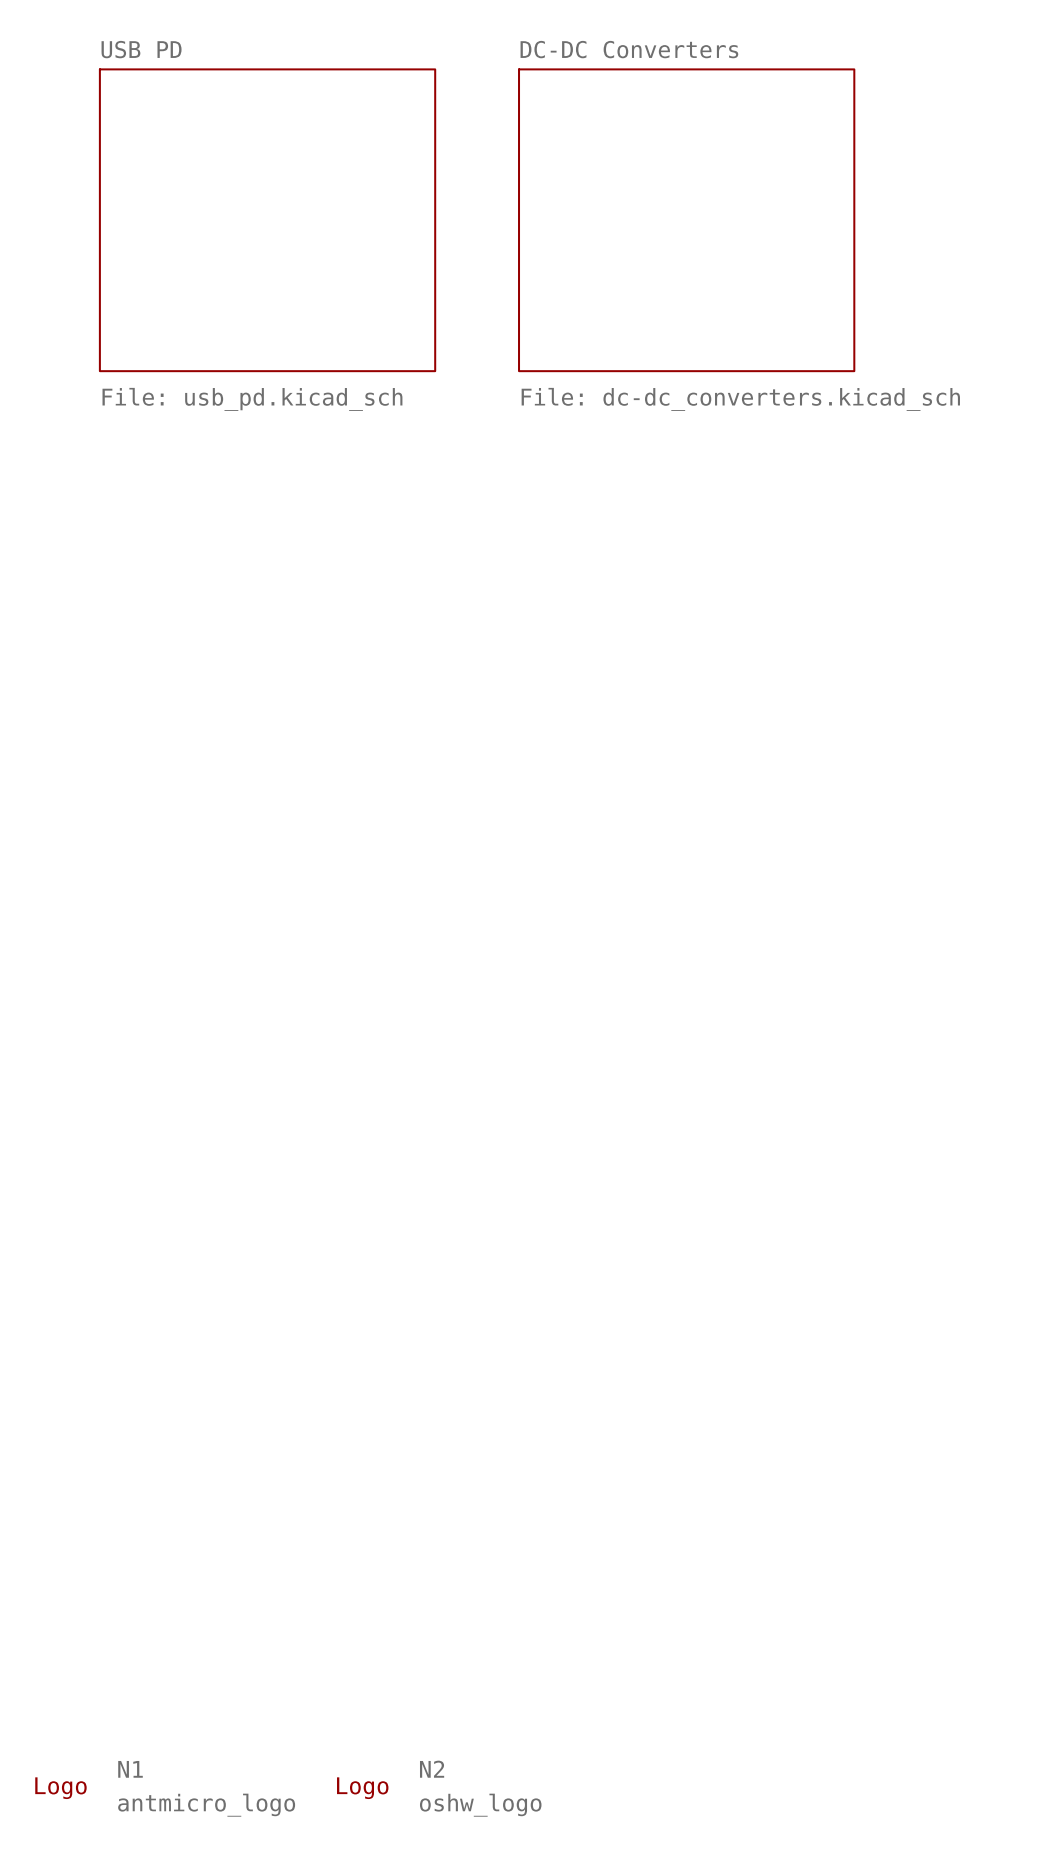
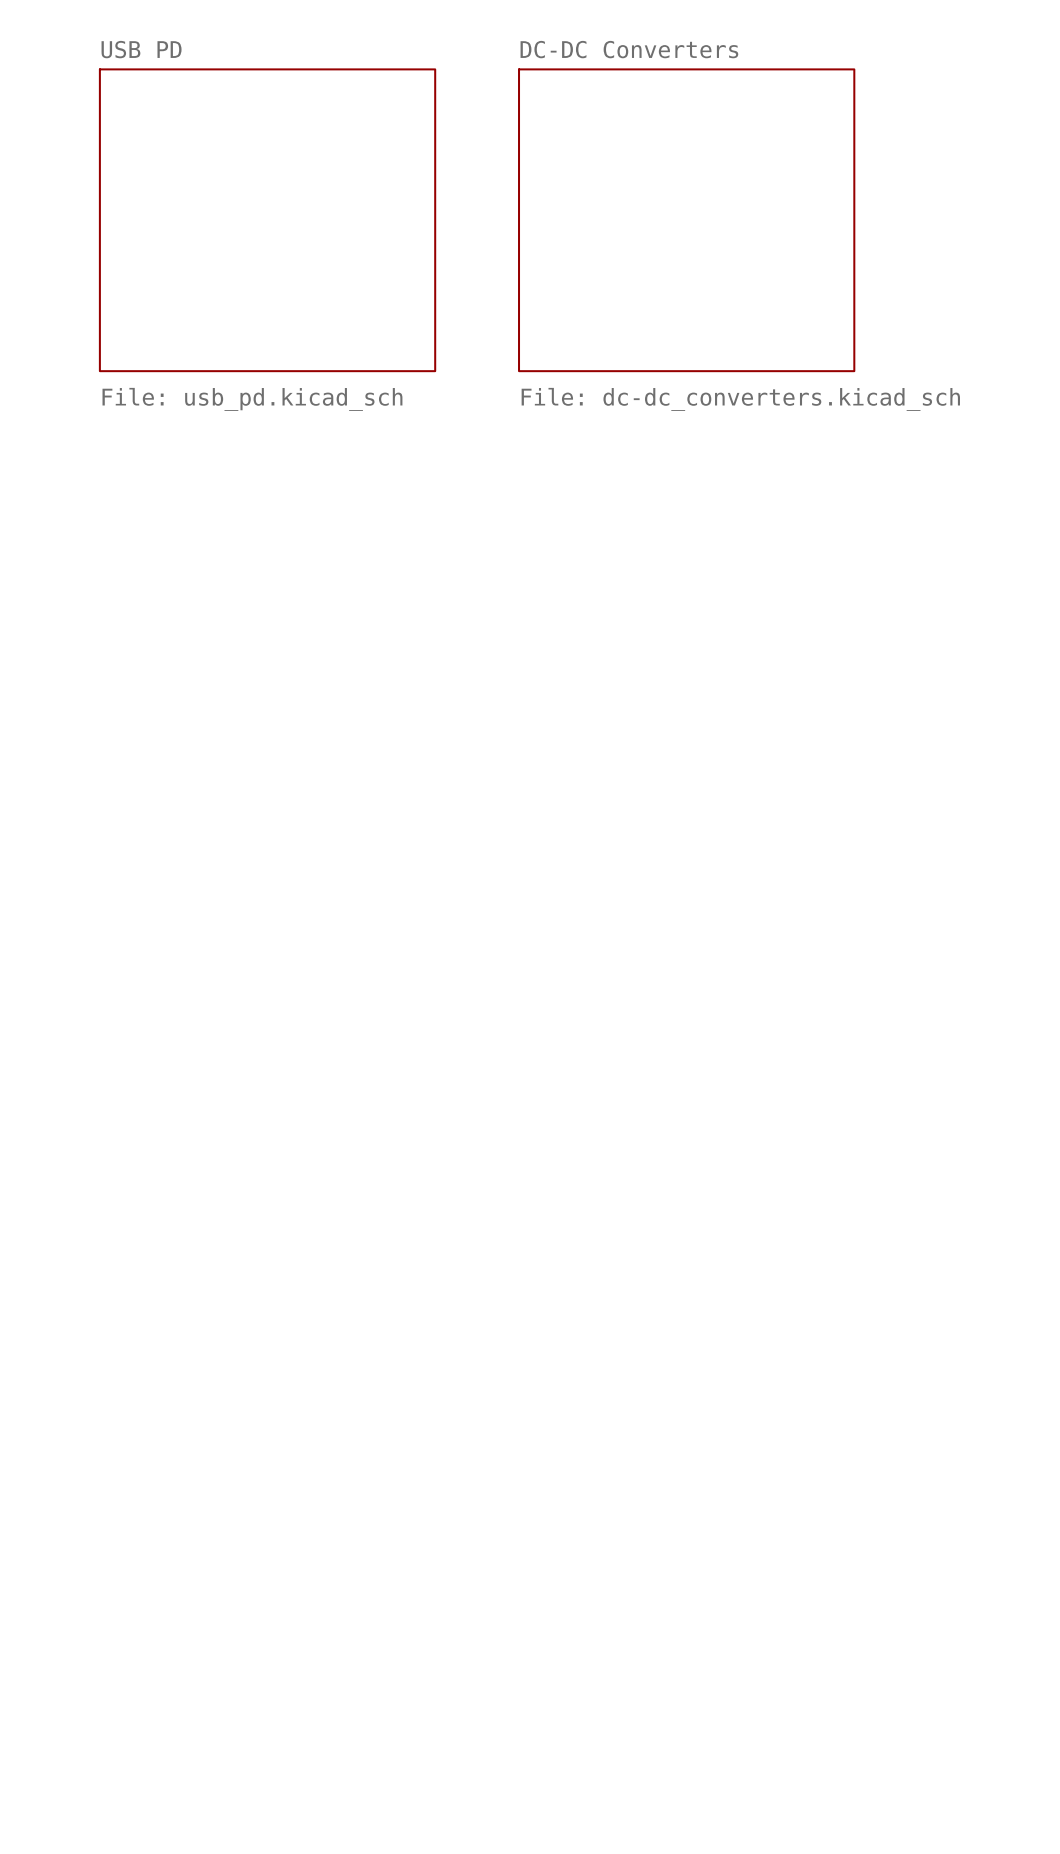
N1: antmicro_logo (165, 1788) -> none
N2: oshw_logo (439, 1788) -> none

